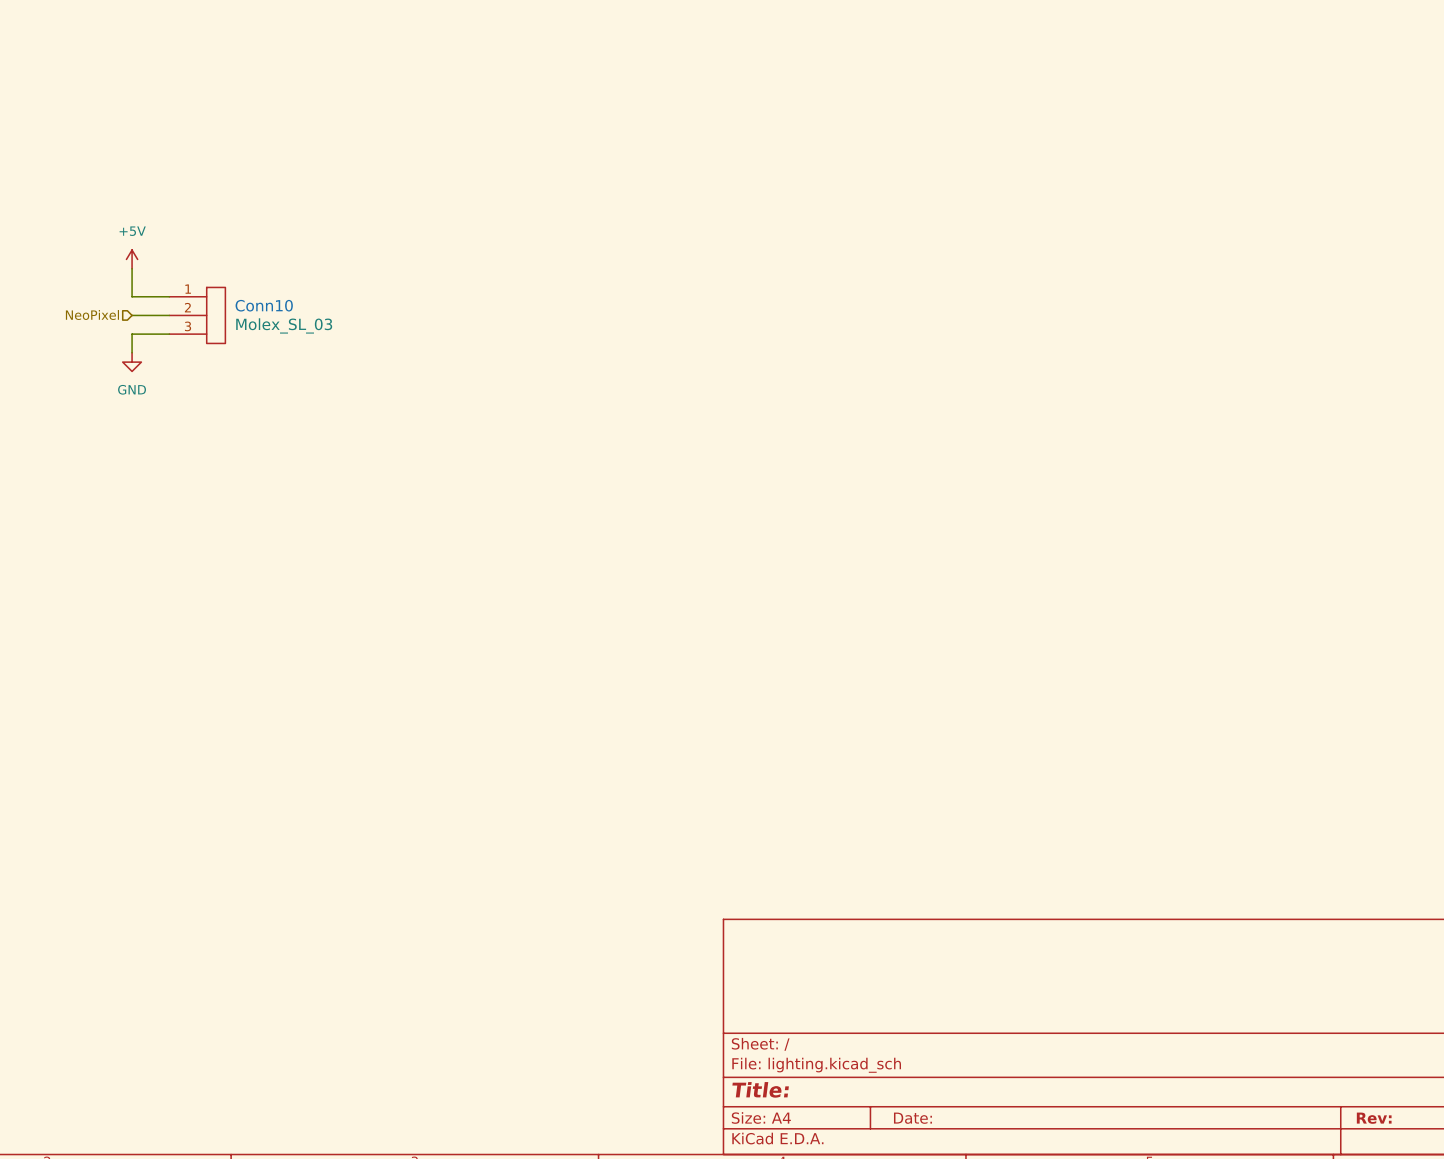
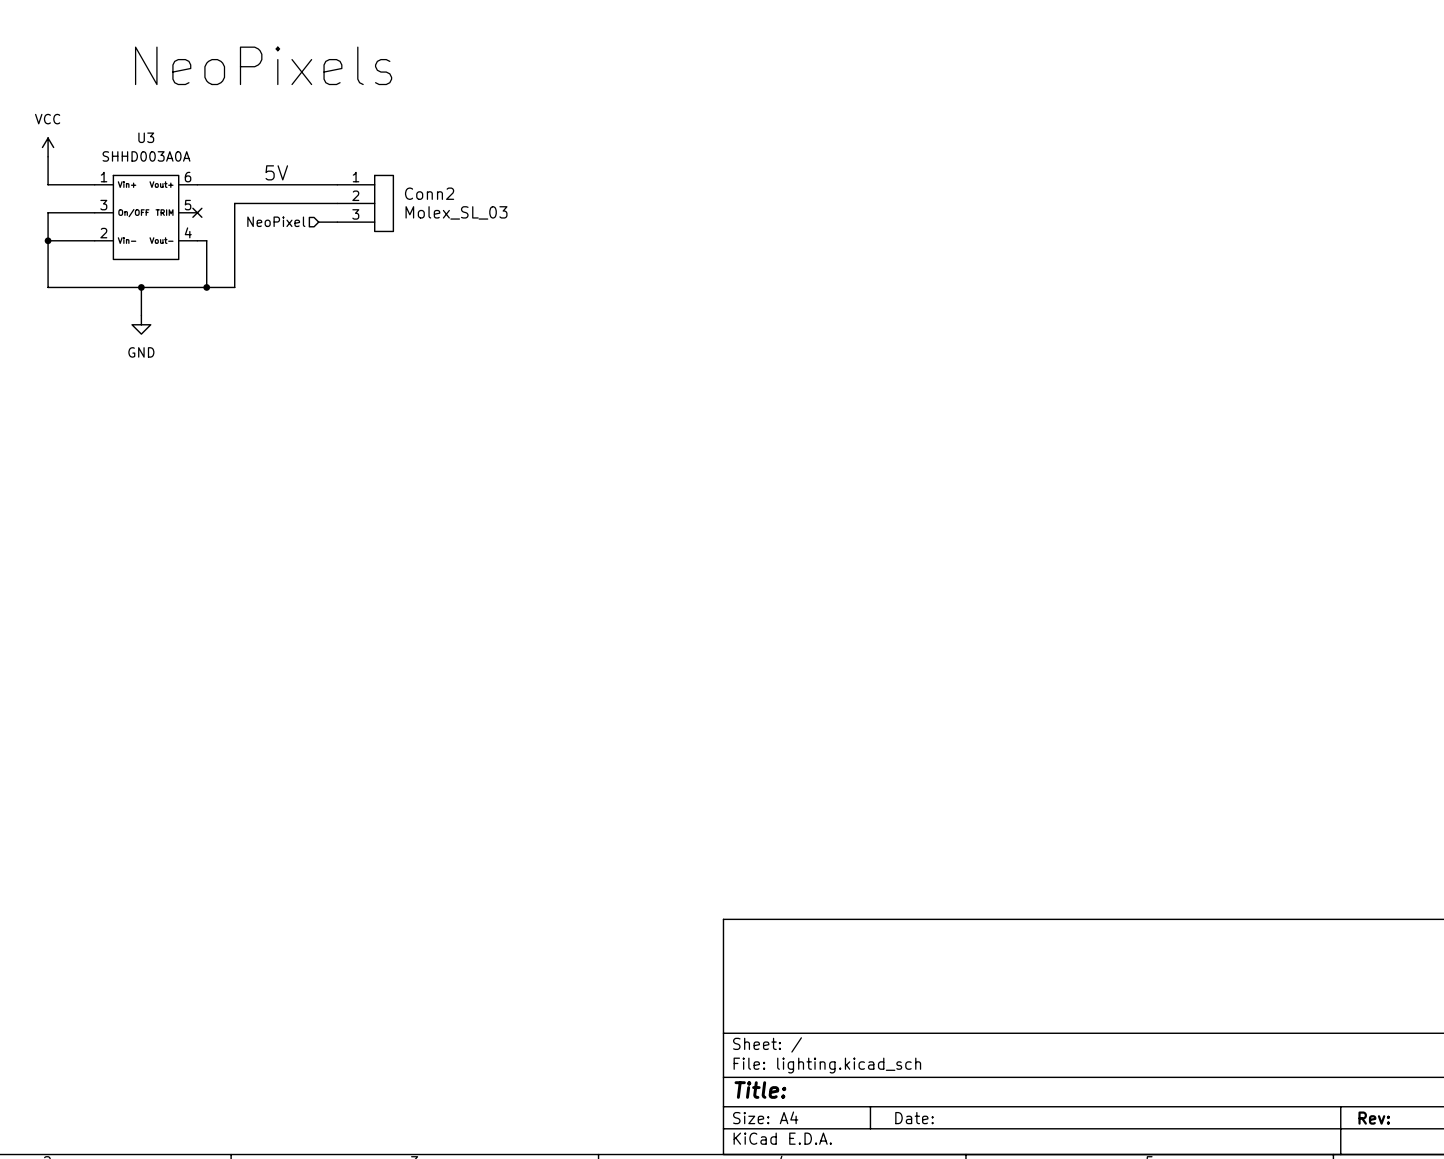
text: none -> NeoPixels (263, 65)
power symbol: none -> VCC (48, 147)
wire: none -> (48, 156) (48, 184) (94, 184)
label: none -> 5V (276, 172)
wire: none -> (197, 184) (337, 184)
wire: none -> (337, 203) (234, 203) (234, 287) (48, 287) (48, 212) (94, 212)
Conn2: none -> Molex_SL_03 (365, 203)
no-connect mark: none -> (197, 212)
U3: none -> SHHD003A0A (146, 217)
hierarchical label: none -> NeoPixel (276, 221)
wire: none -> (318, 222) (337, 222)
wire: none -> (48, 240) (94, 240)
junction: none -> (48, 240)
wire: none -> (197, 240) (206, 240) (206, 287)
power symbol: +5V (132, 259) -> none
wire: (132, 268) (132, 296) (169, 296) -> none
wire: none -> (141, 287) (141, 315)
junction: none -> (141, 287)
junction: none -> (206, 287)
hierarchical label: NeoPixel (92, 314) -> none
wire: (132, 315) (169, 315) -> none
Conn10: Molex_SL_03 (197, 315) -> none
wire: (169, 334) (132, 334) (132, 352) -> none
power symbol position: GND (132, 362) -> GND (141, 324)

